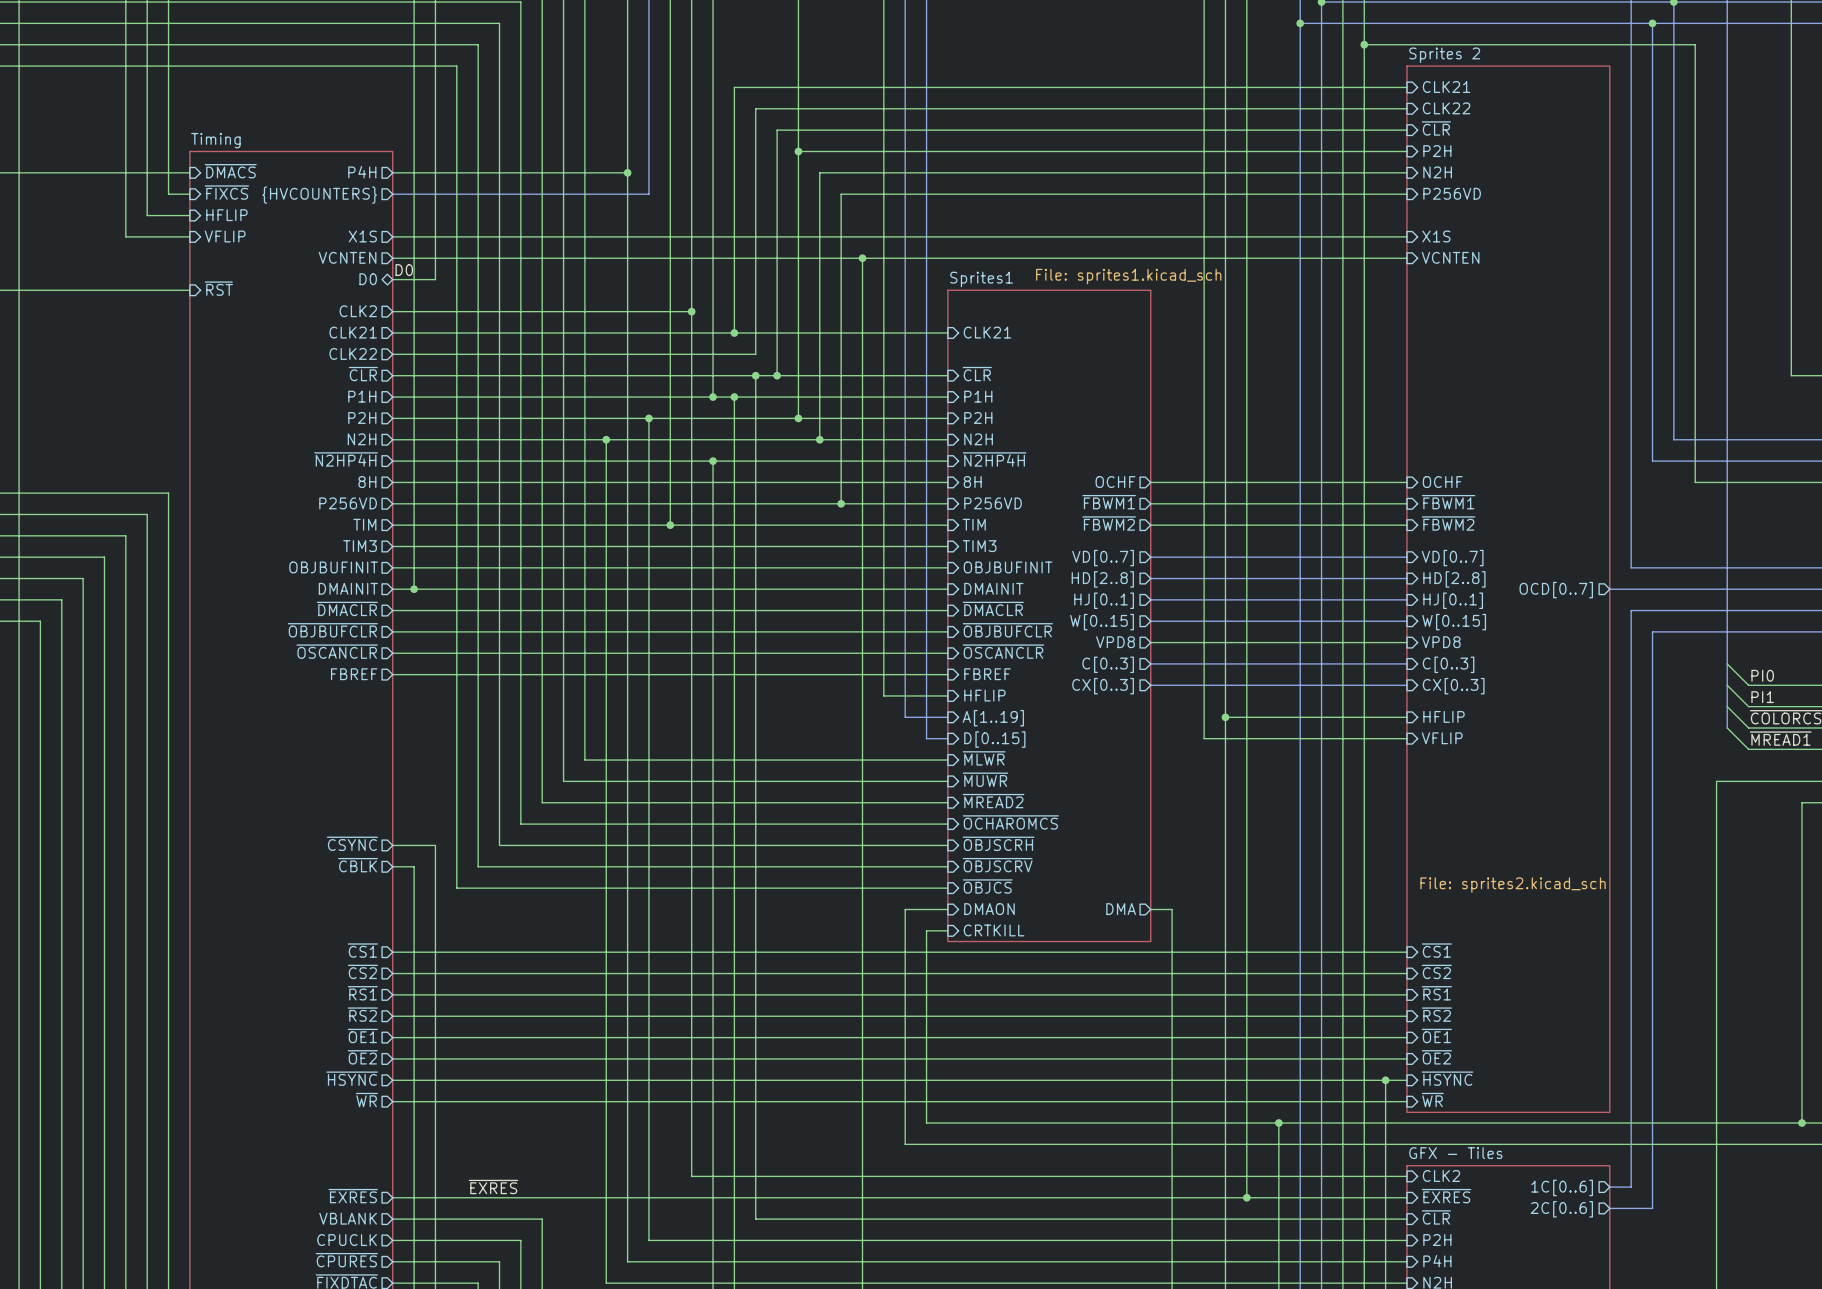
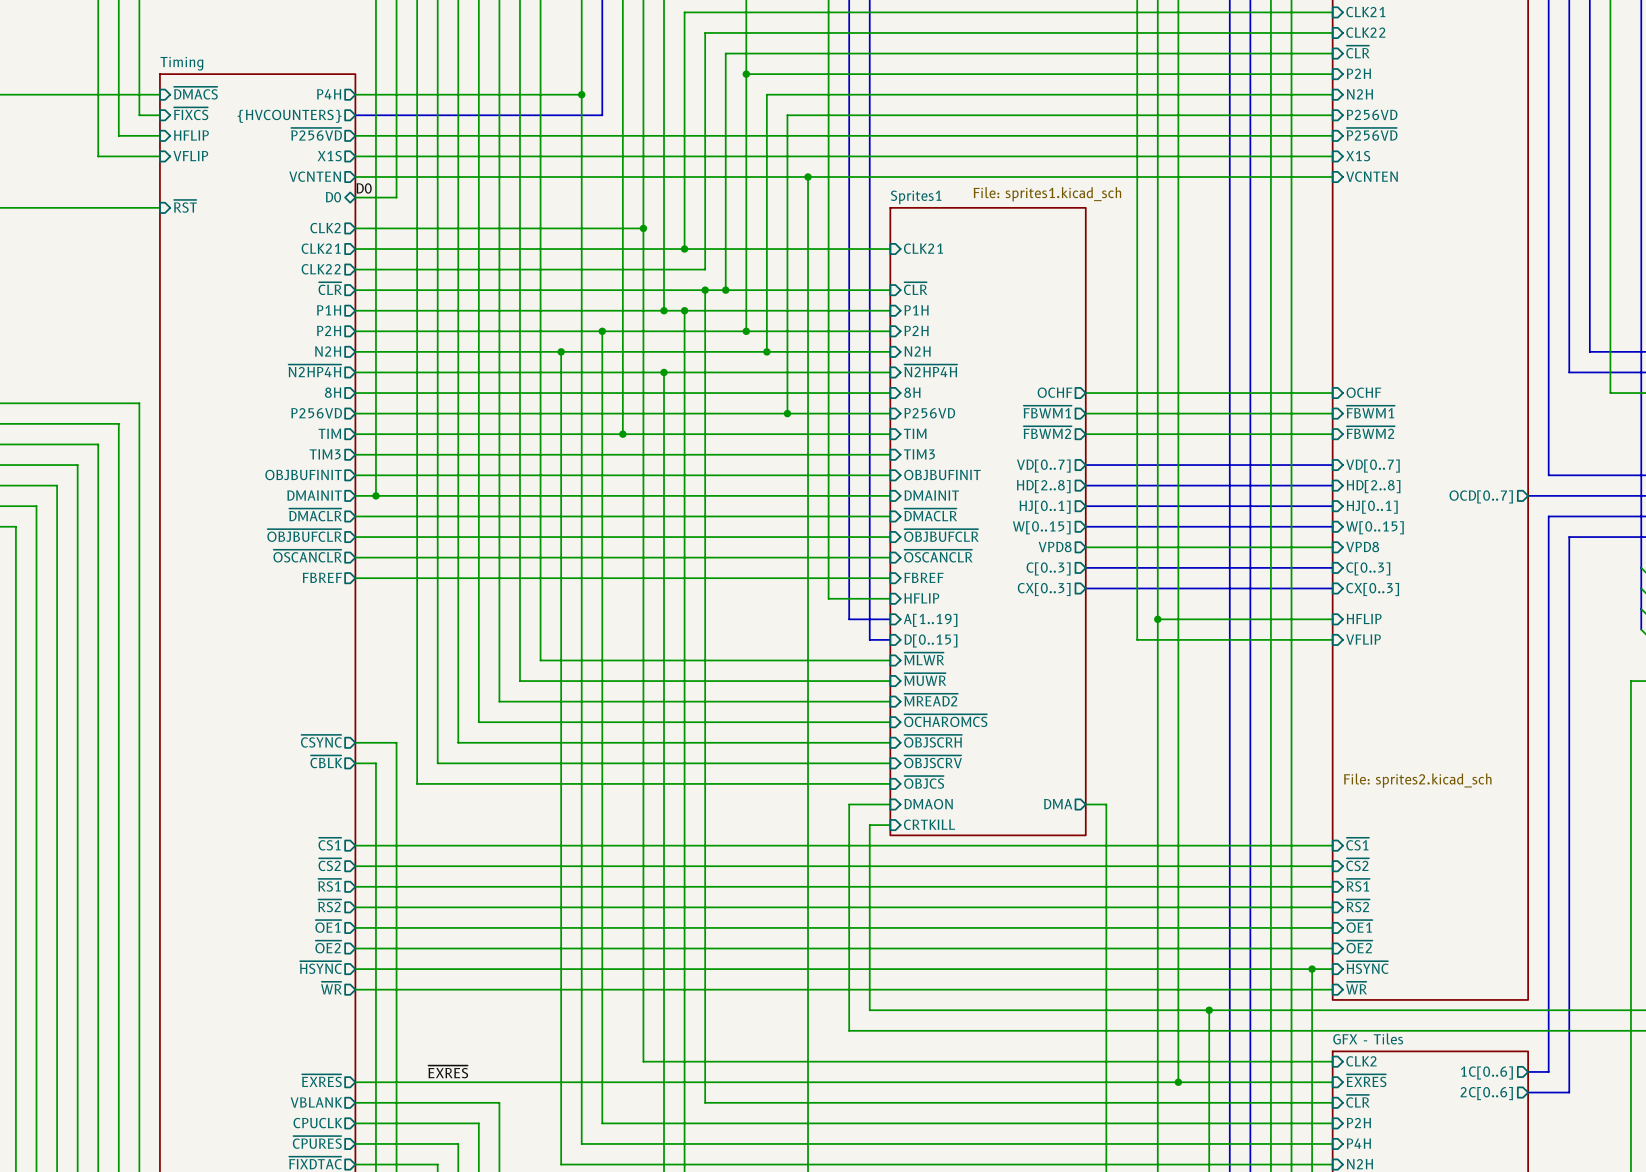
sheet pin: none -> ~{P256VD} (316, 134)
sheet pin: none -> ~{P256VD} (1372, 134)
wire: none -> (355, 135) (1332, 135)

